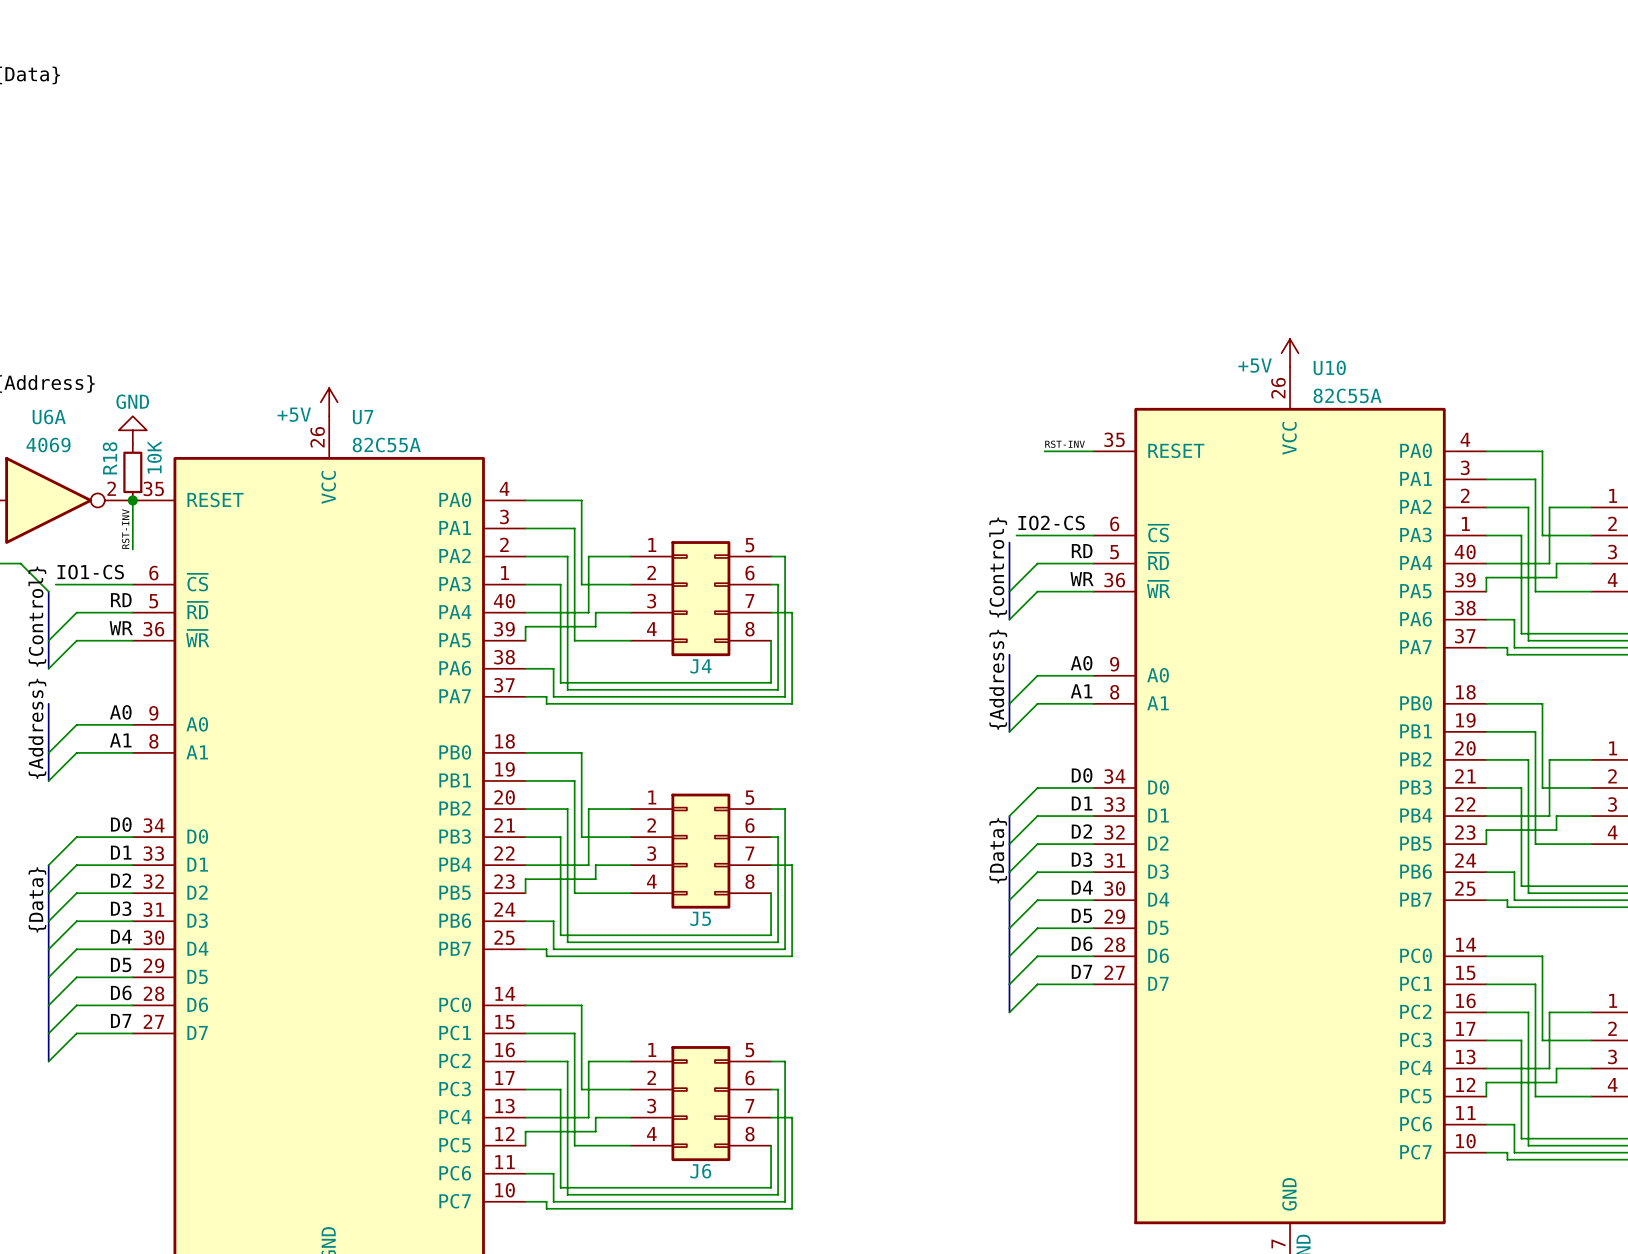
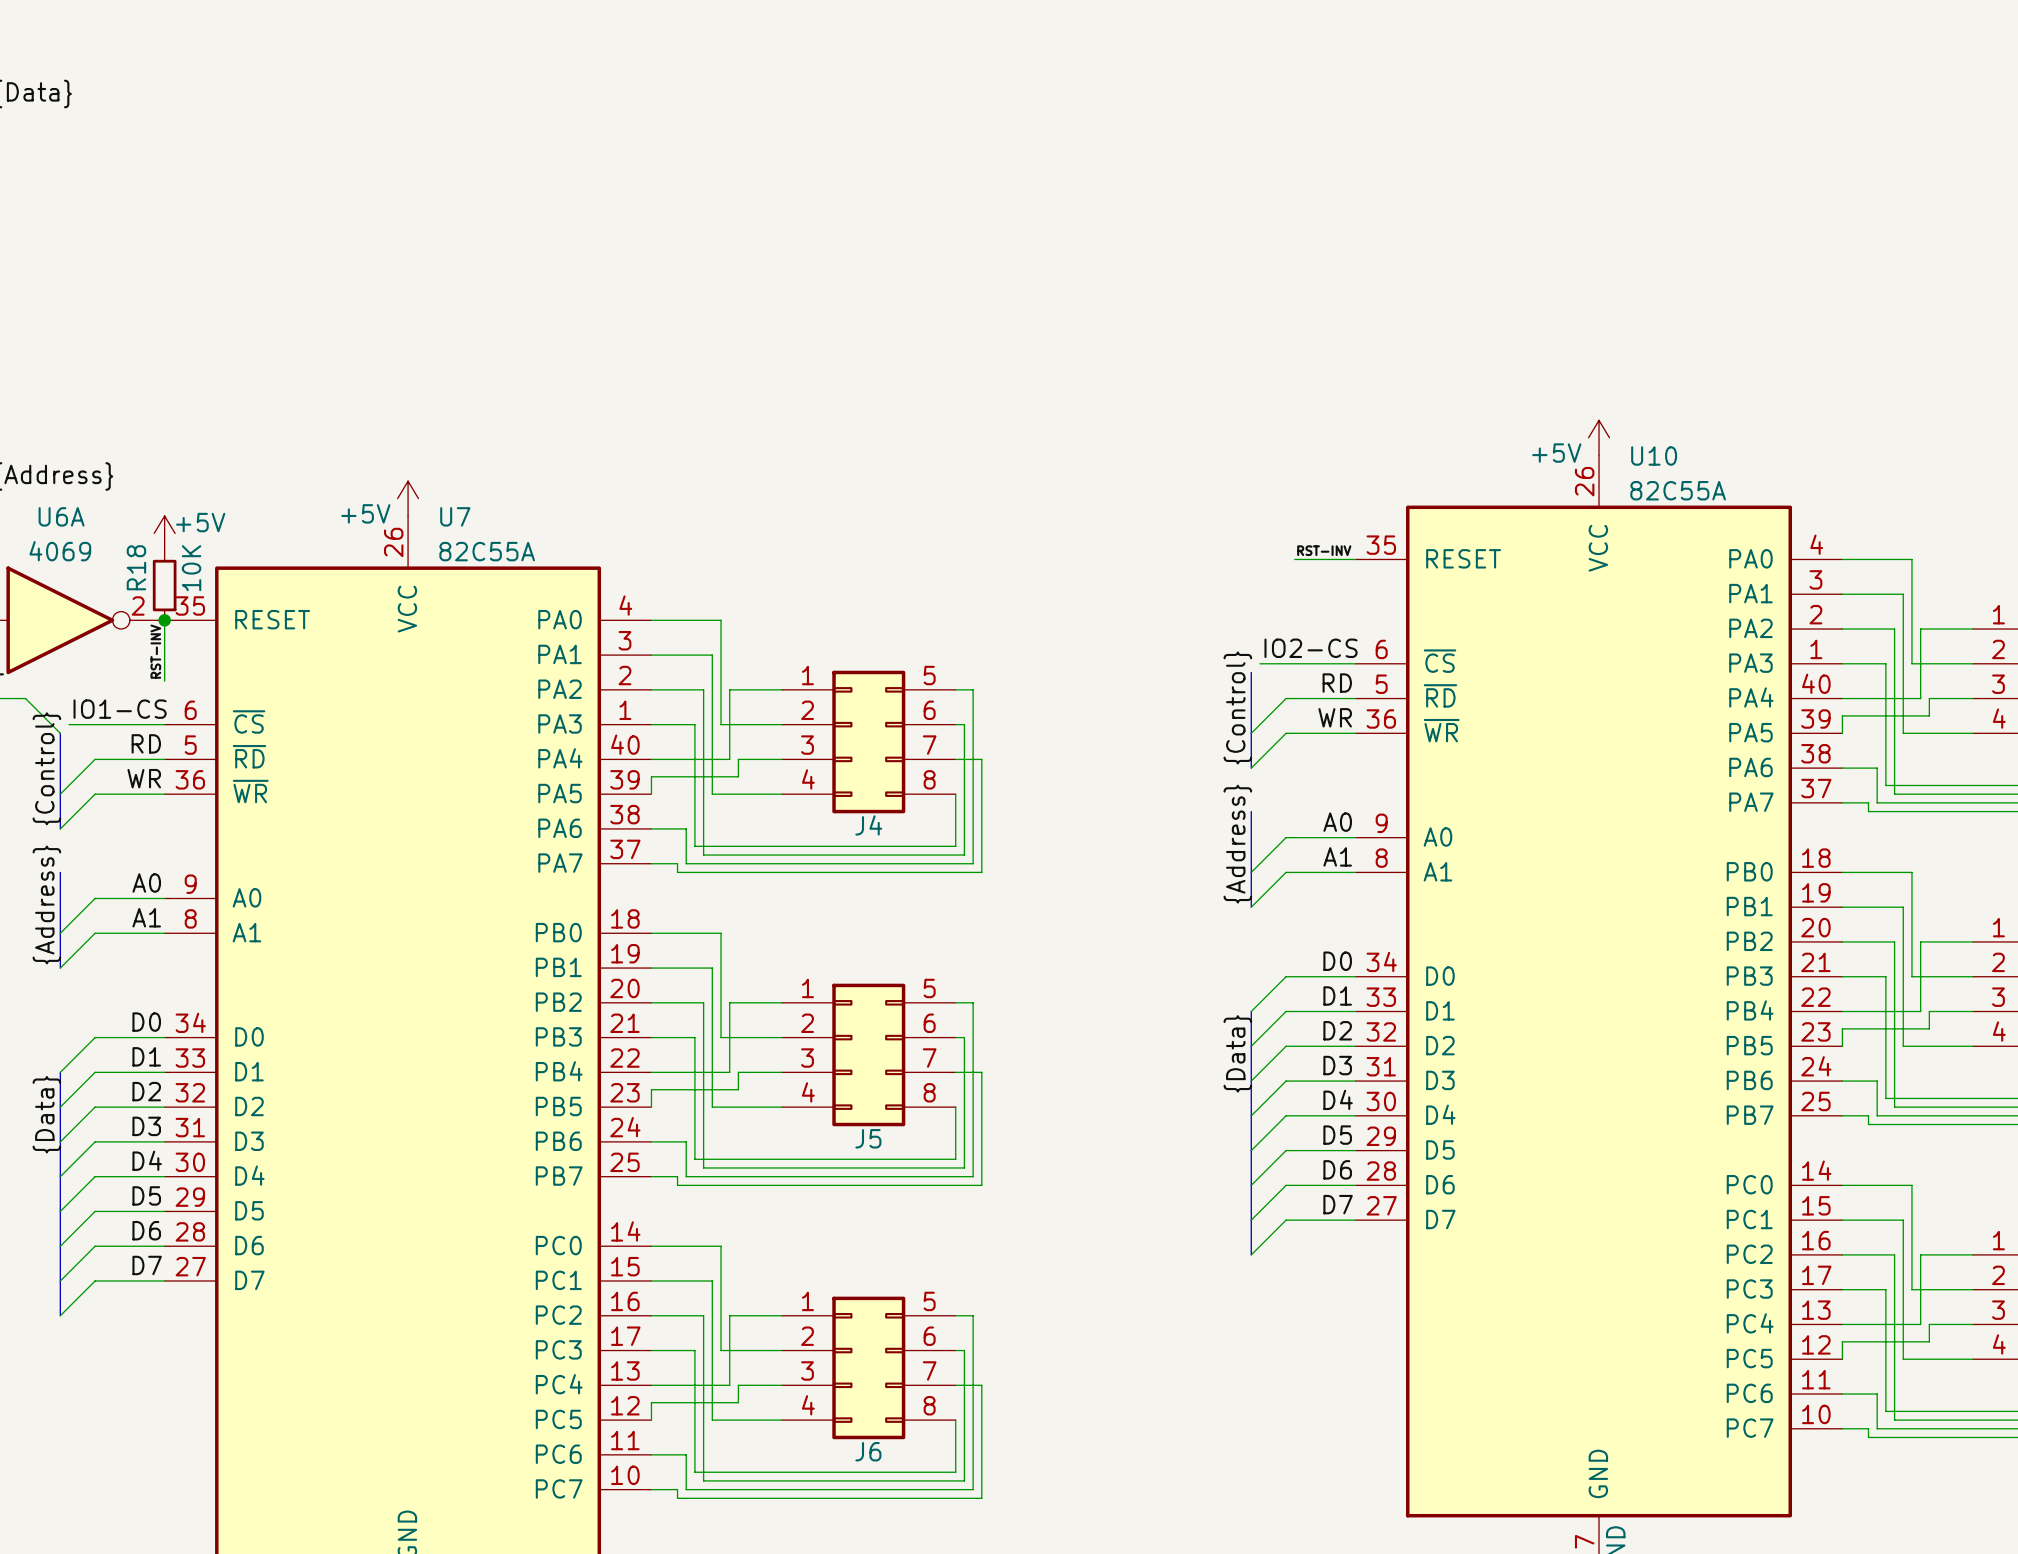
power symbol: GND (132, 430) -> +5V (164, 533)

